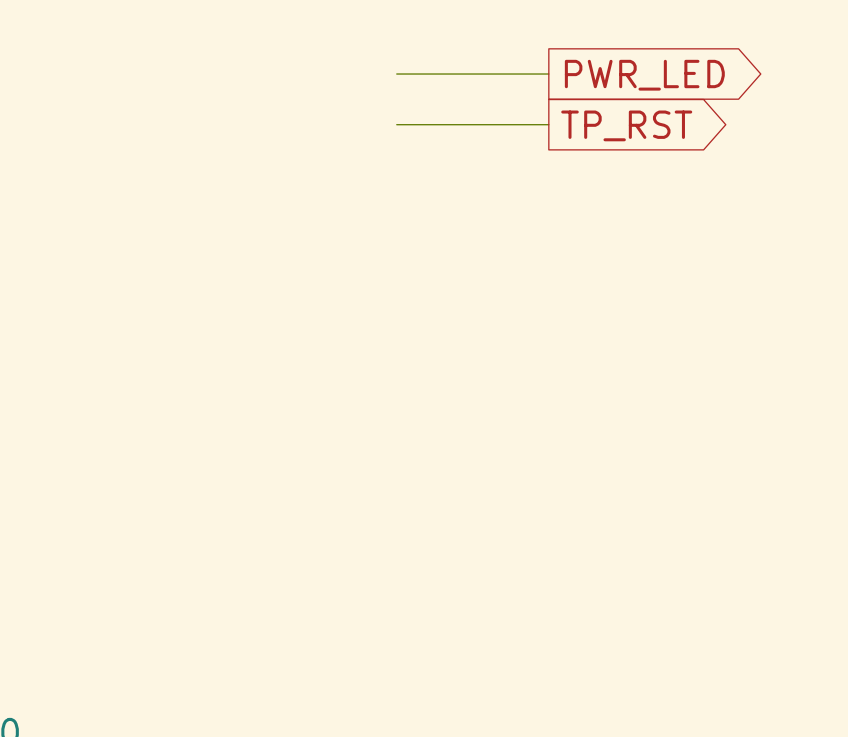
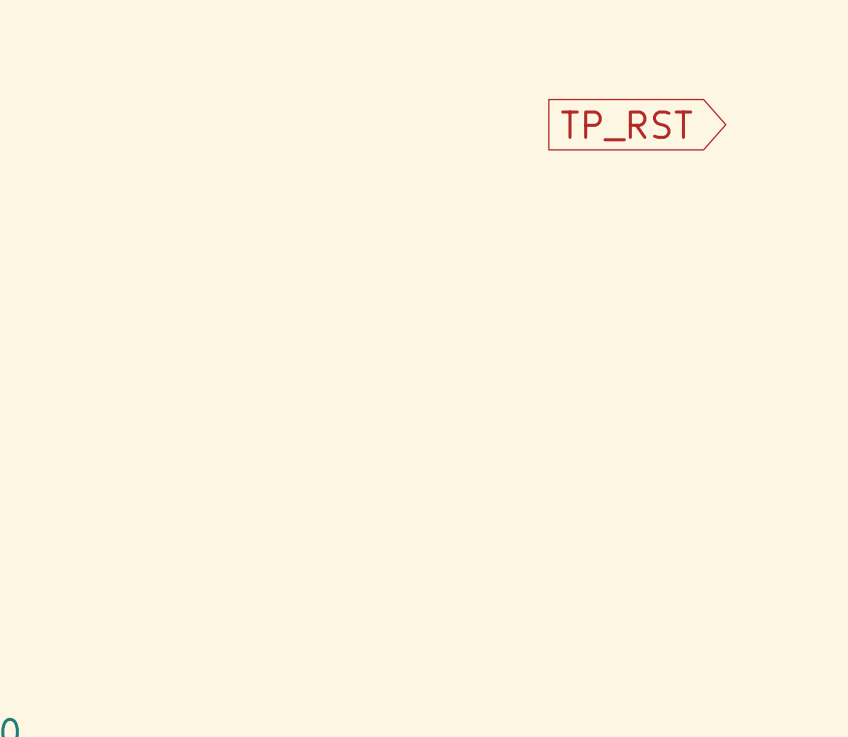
wire: (396, 74) (548, 74) -> none
global label: PWR_LED (644, 75) -> none
wire: (396, 124) (548, 124) -> none

